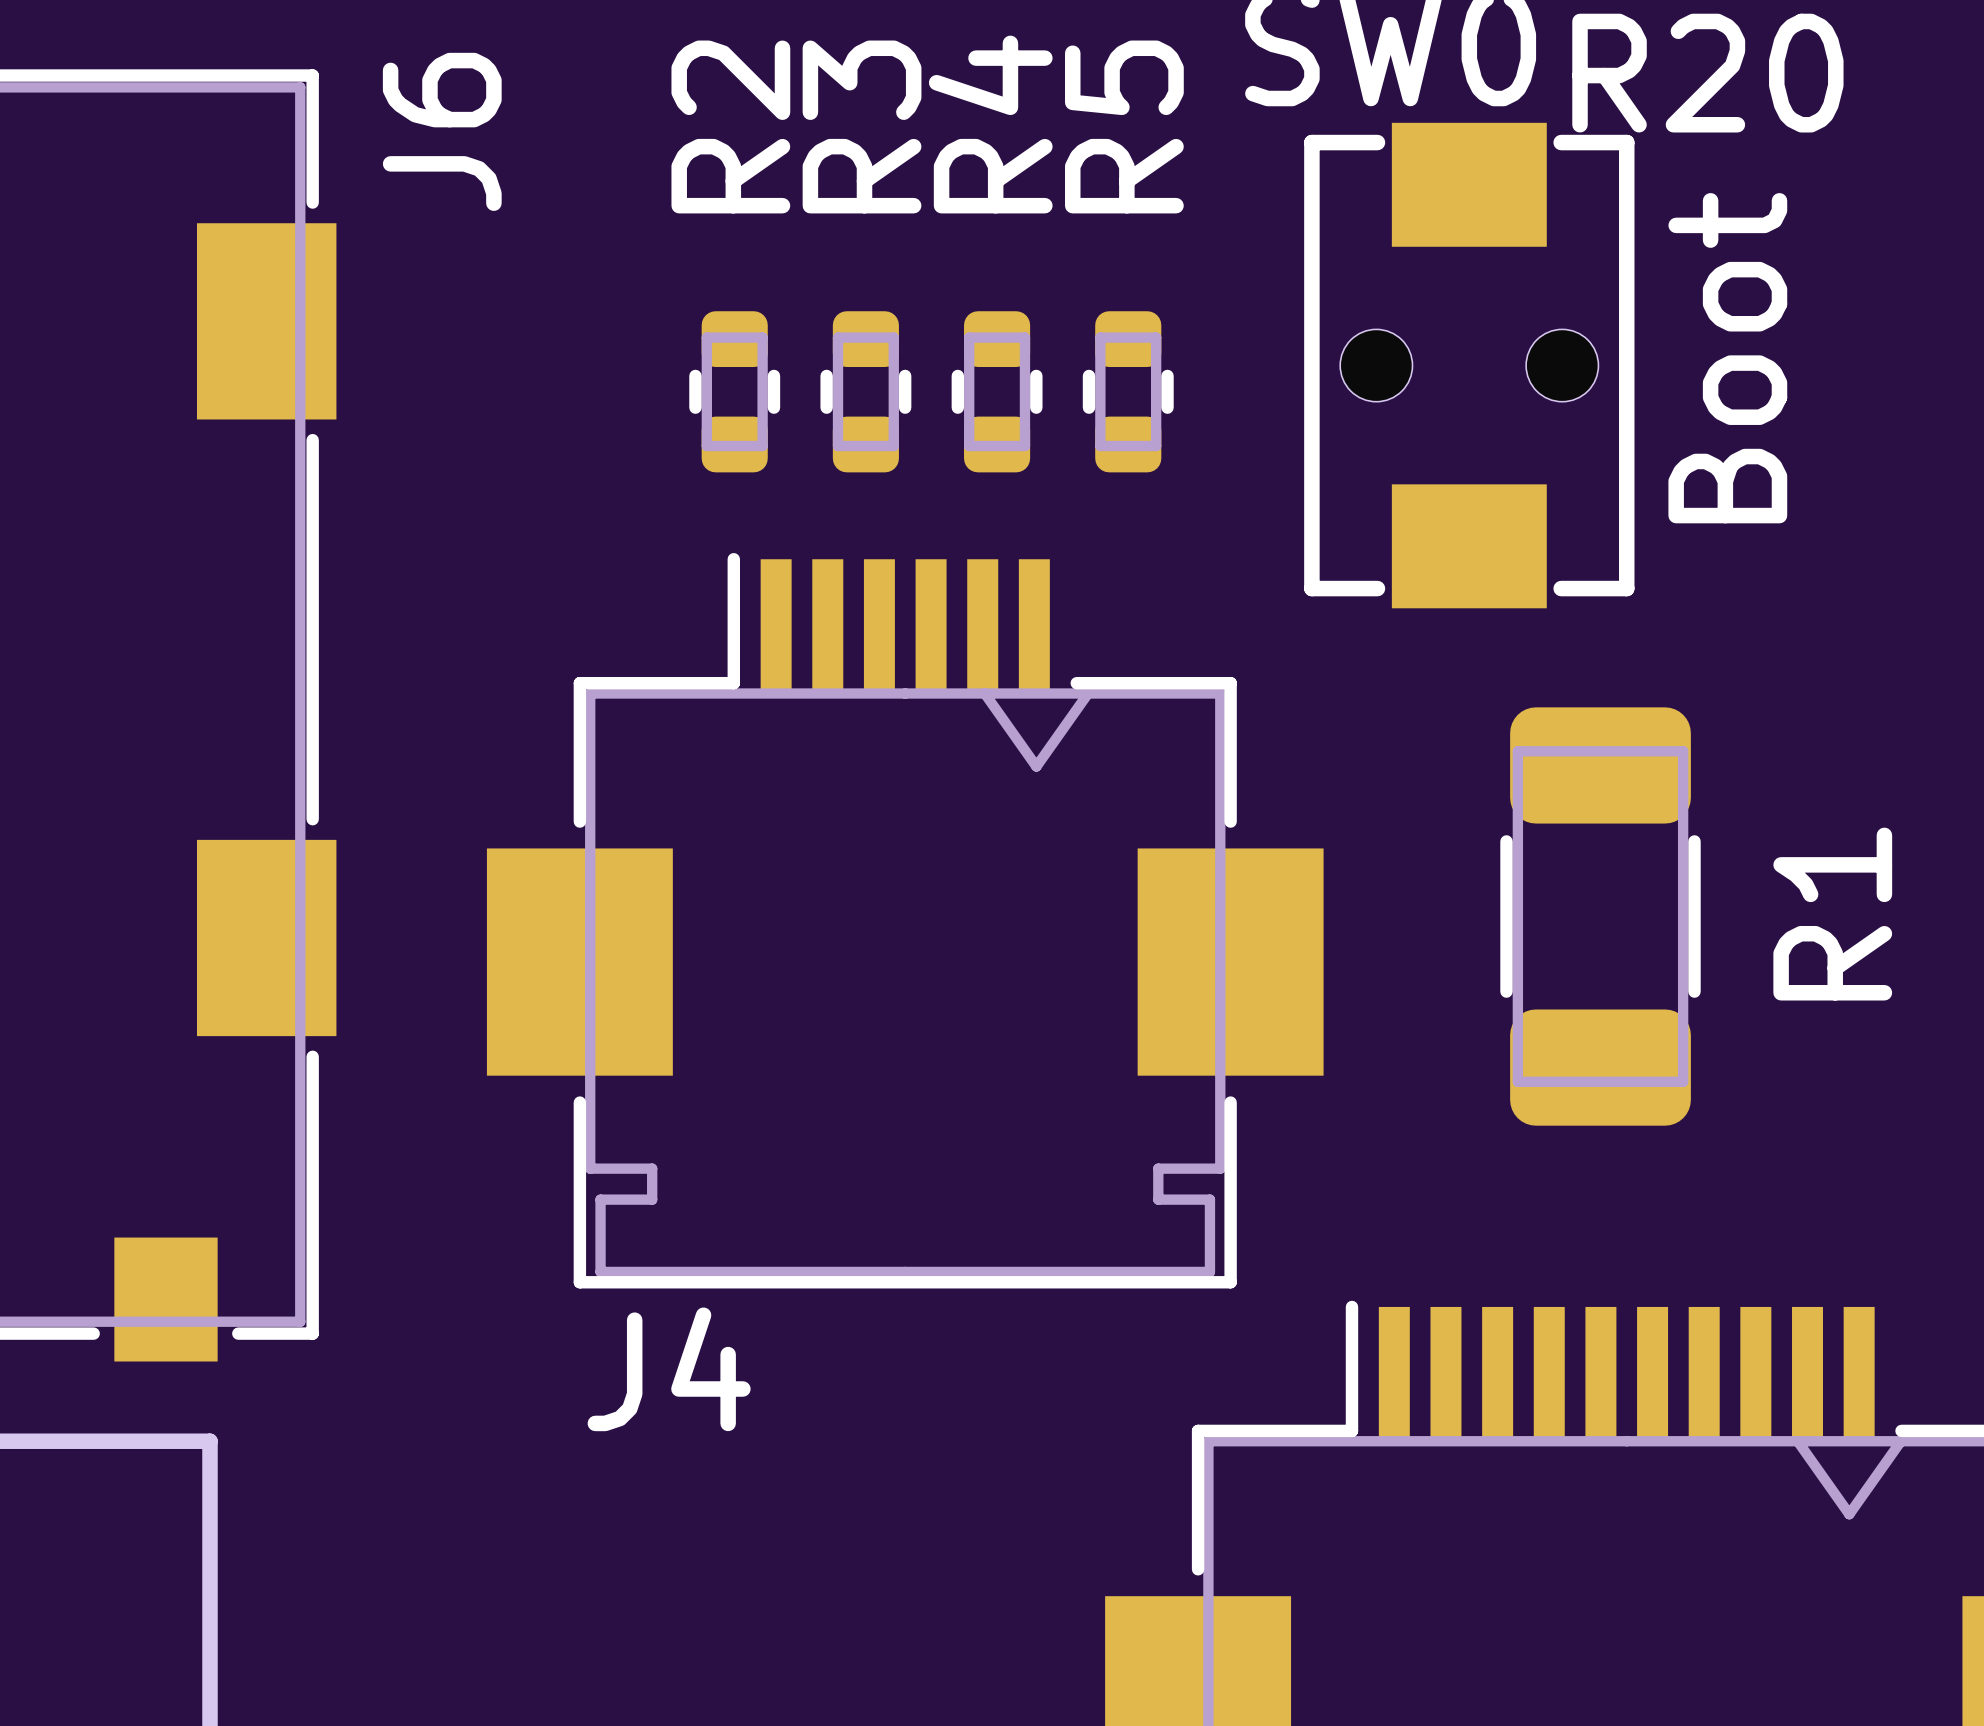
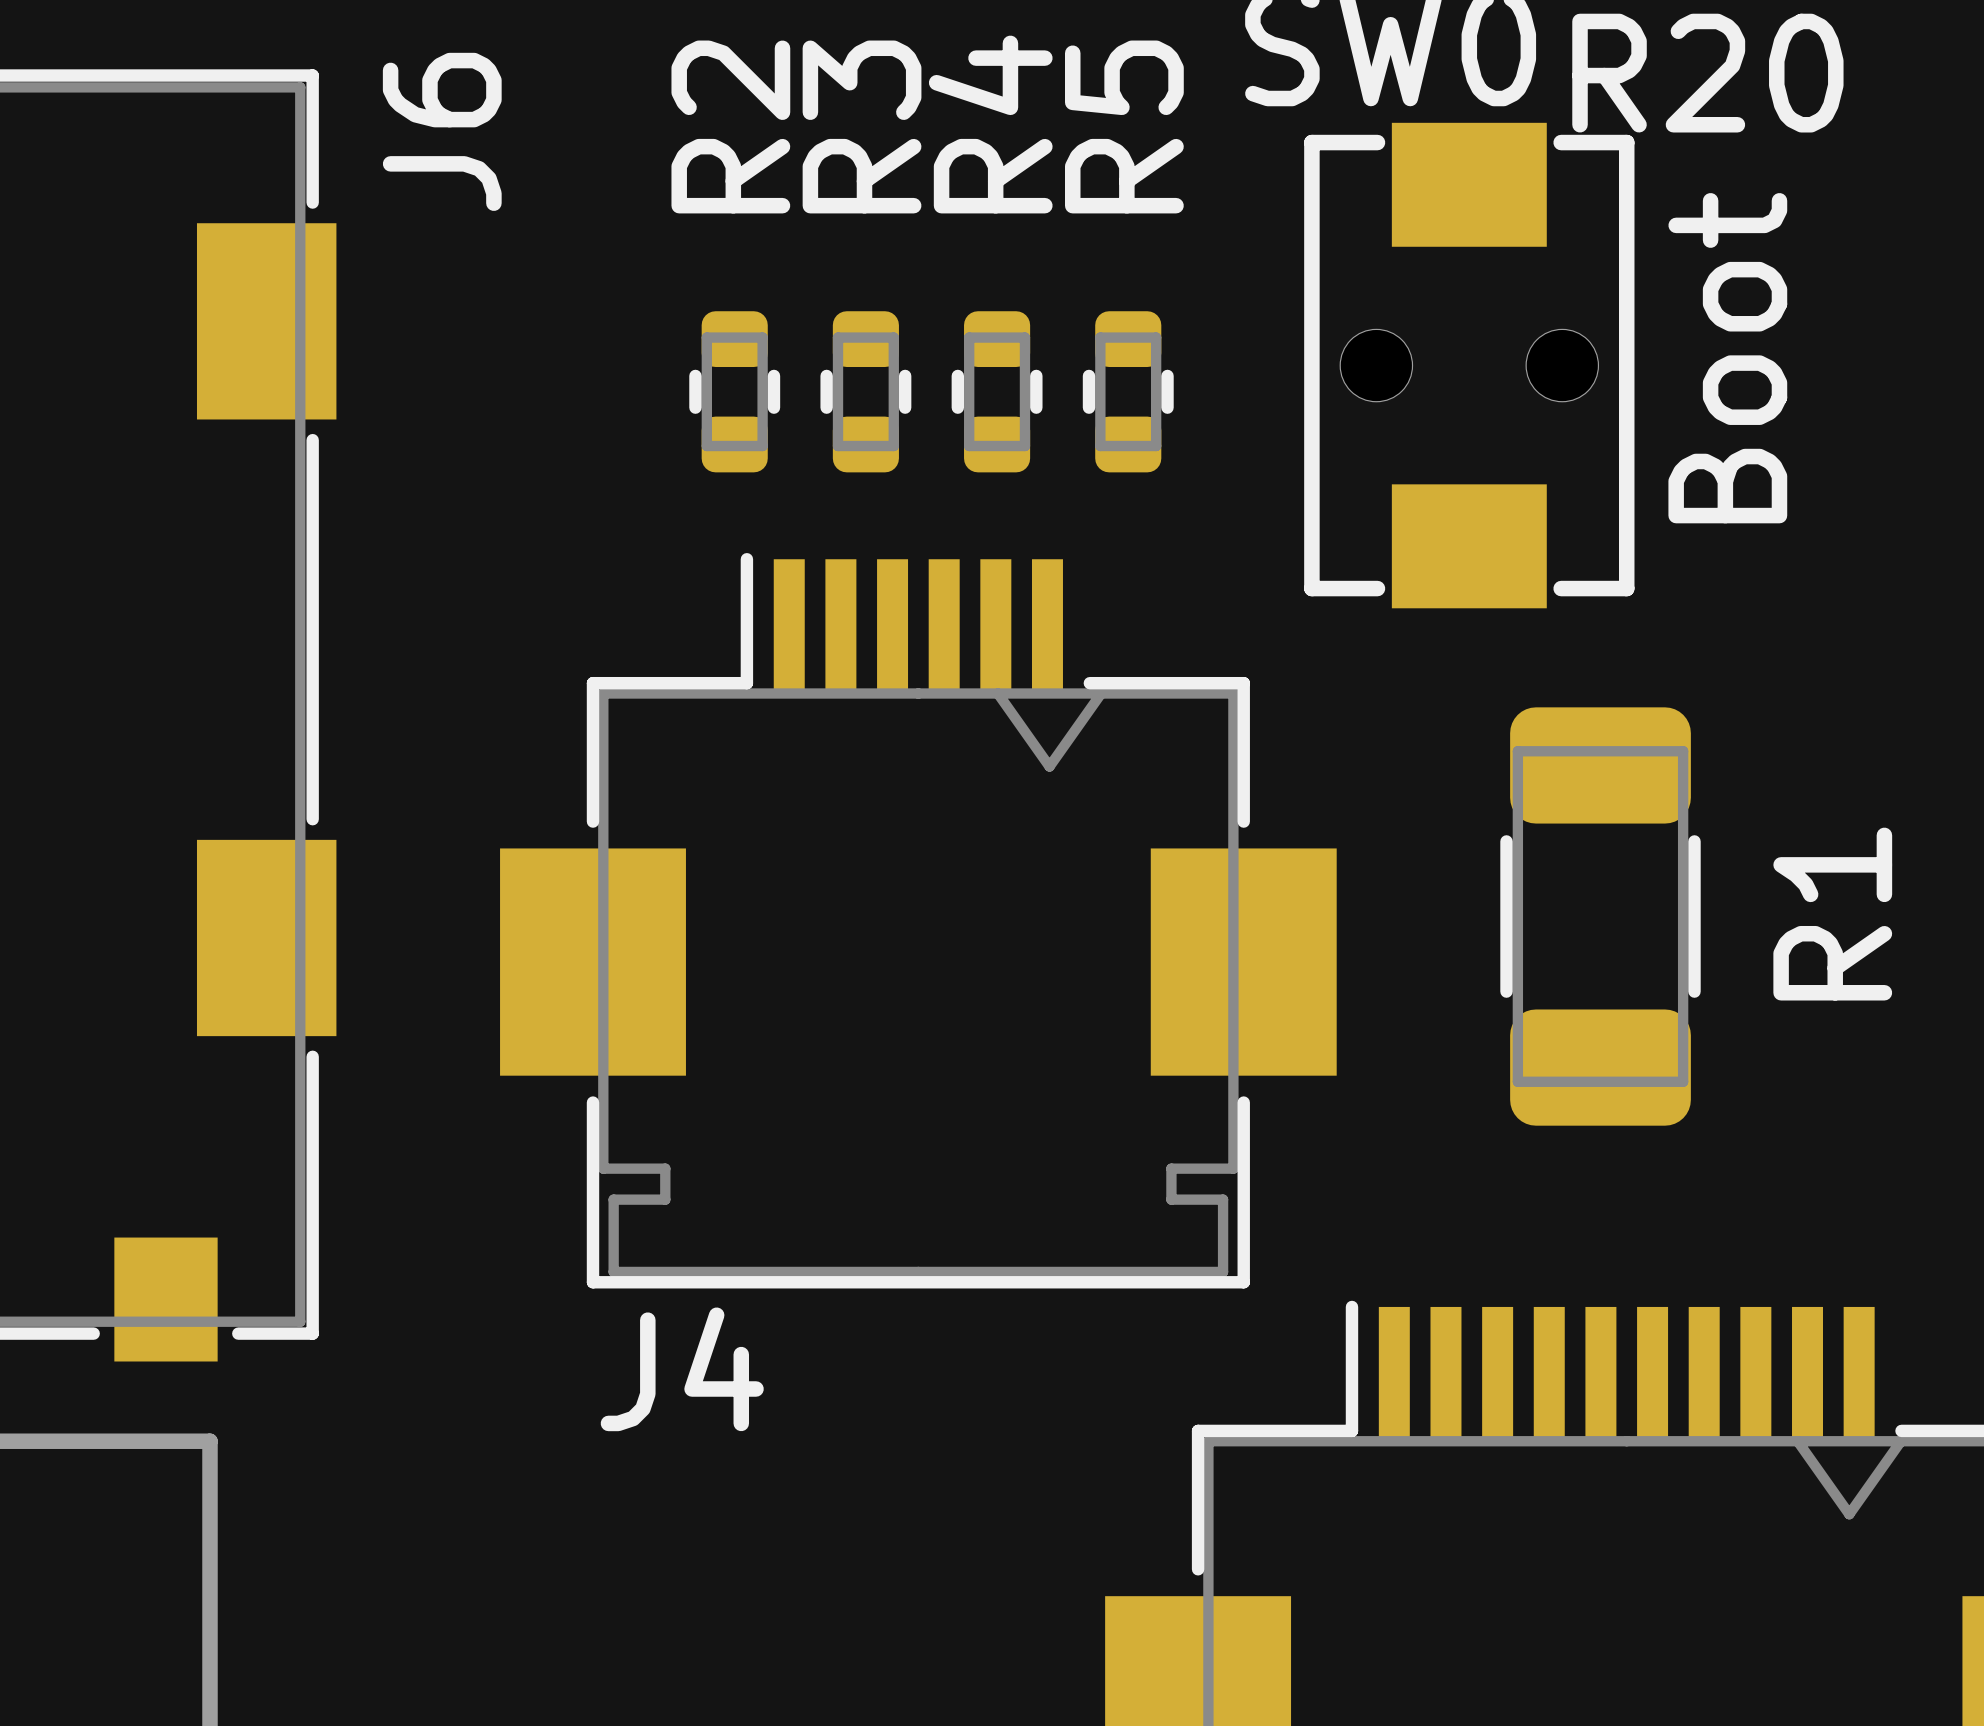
J4 position: (905, 920) -> (918, 920)

